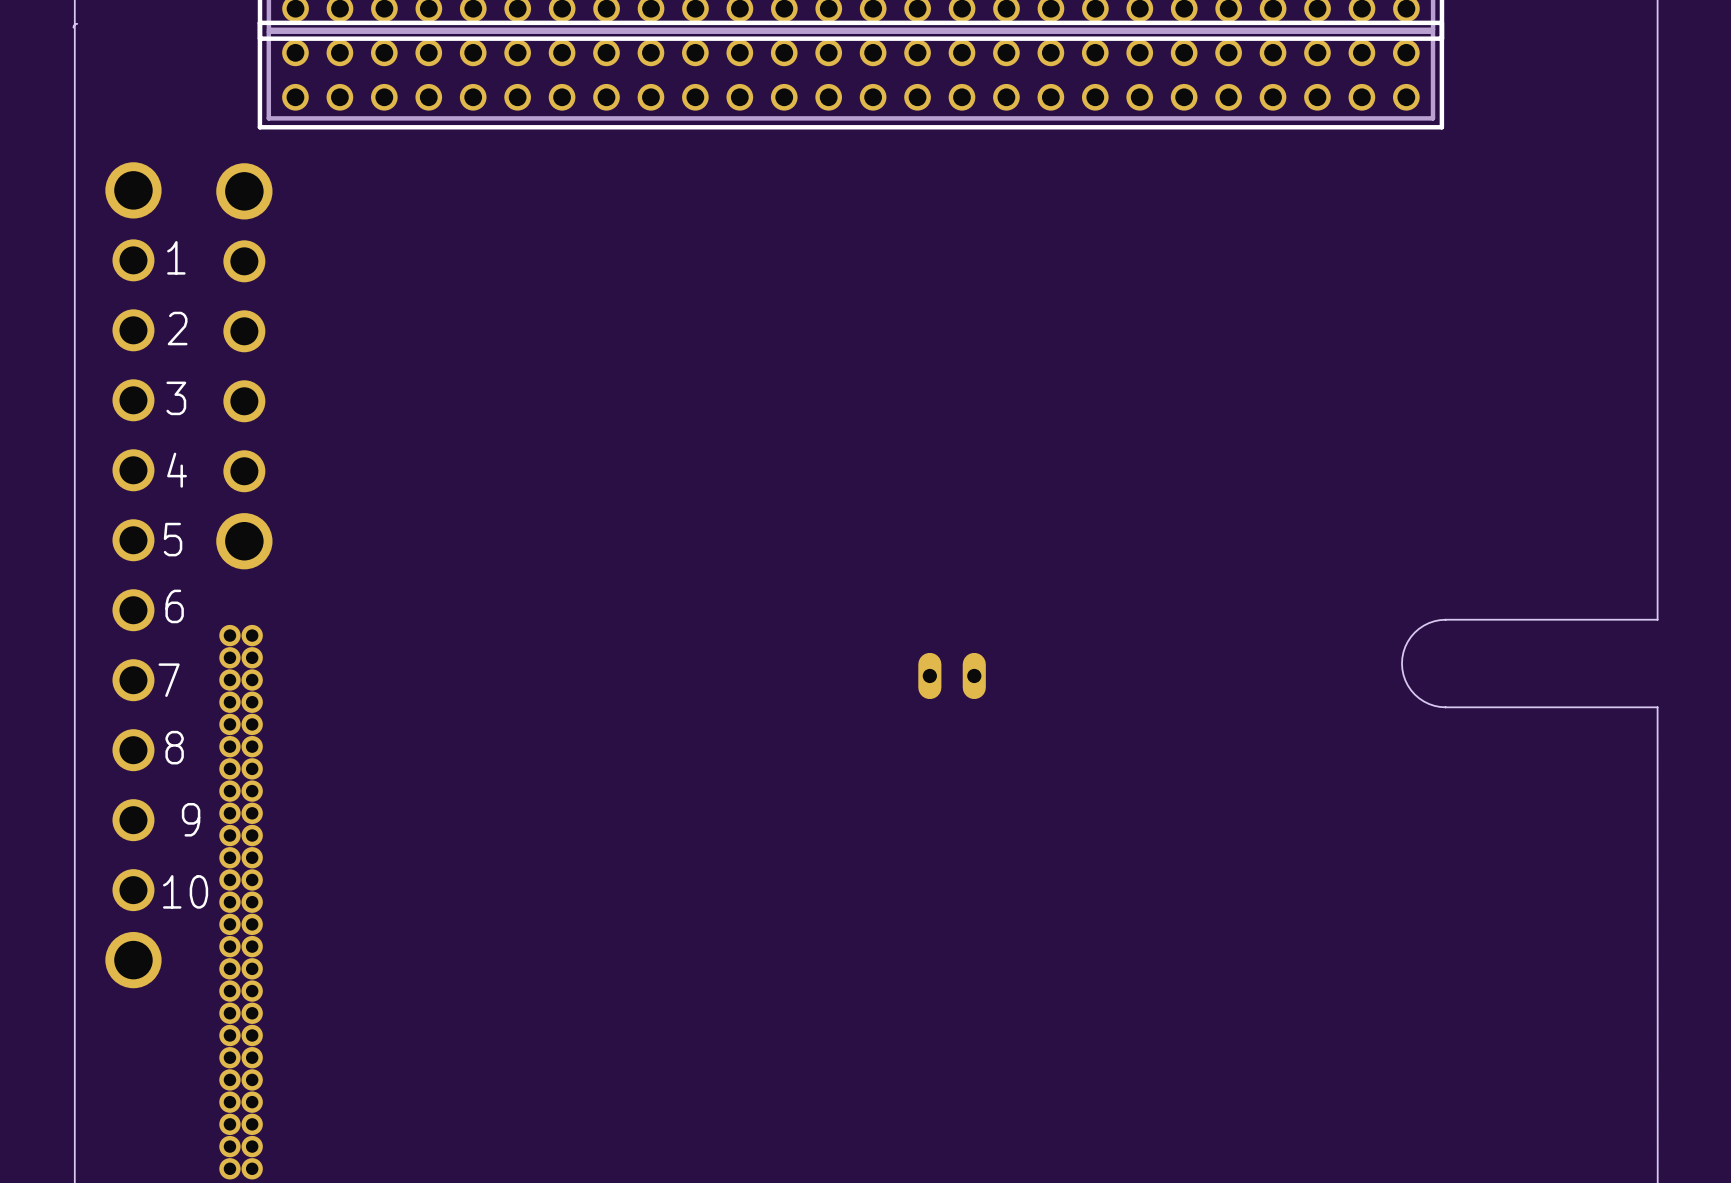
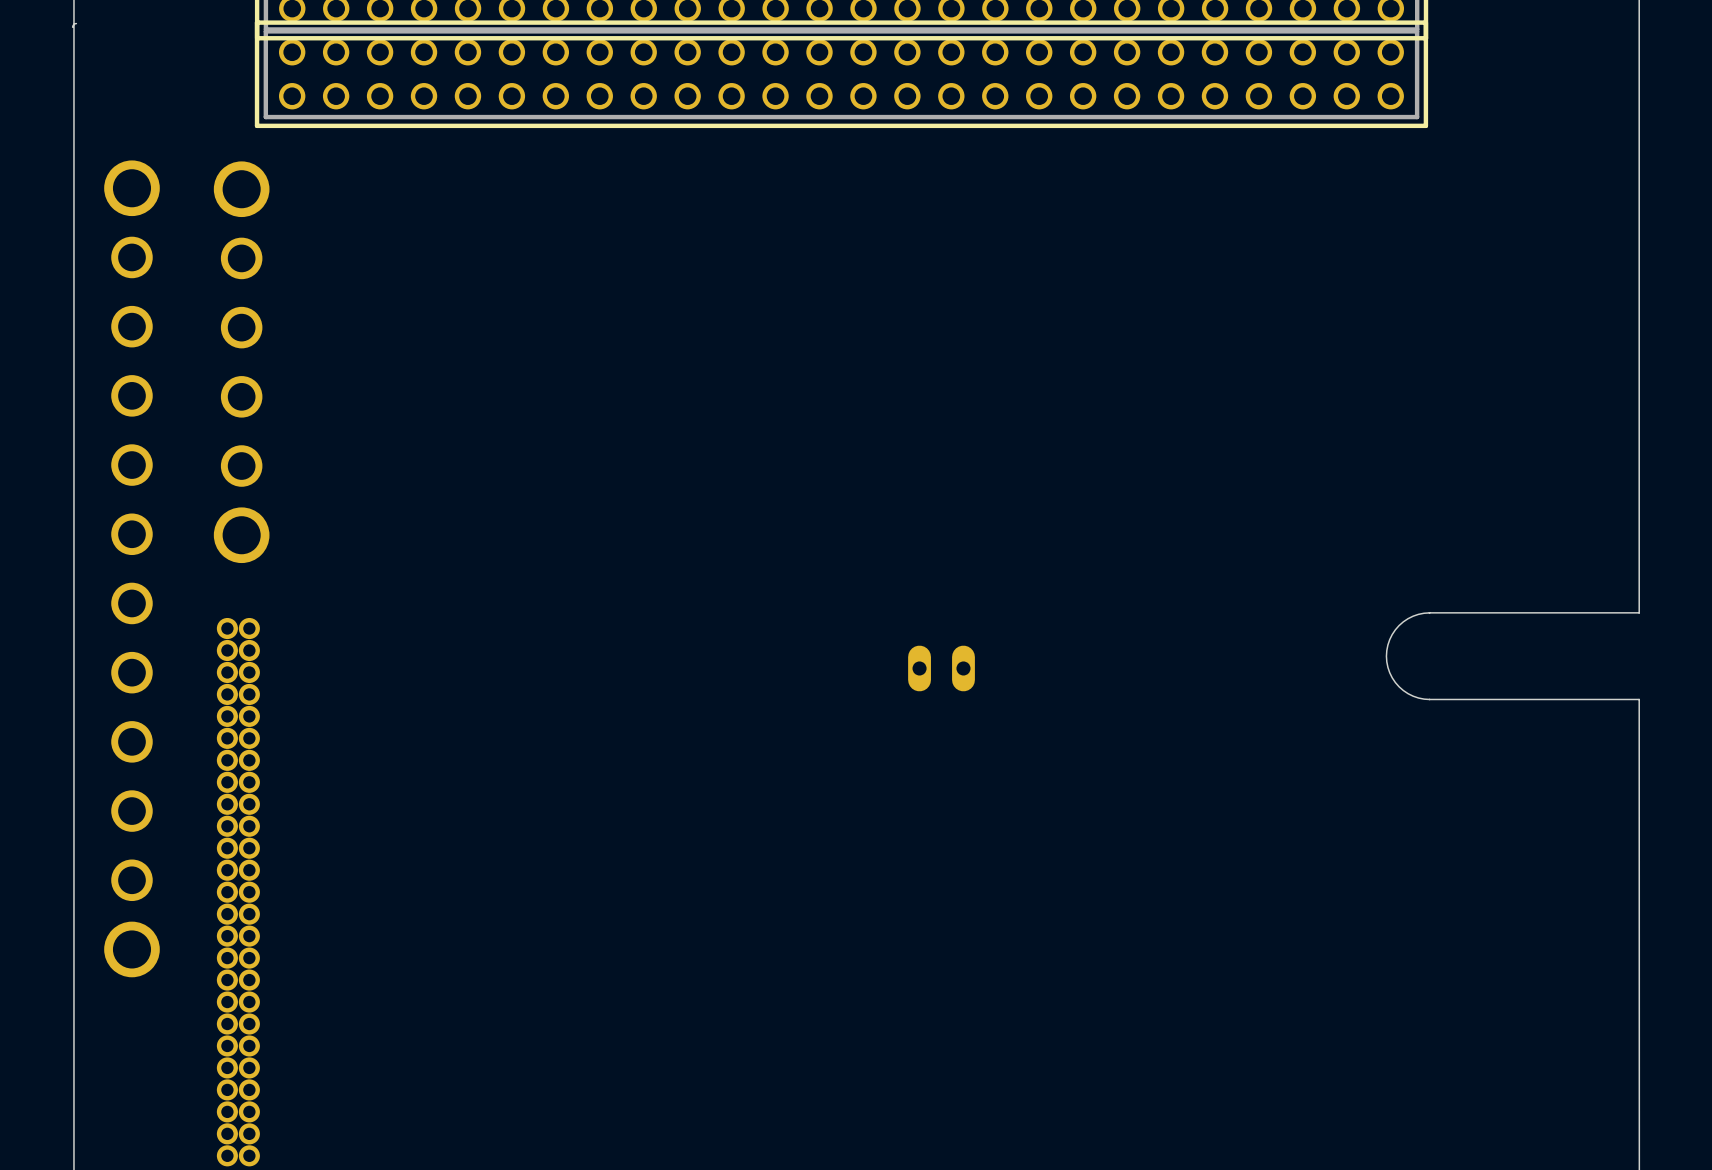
text: 1 (176, 257) -> none
text: 2 (177, 328) -> none
text: 3 (176, 398) -> none
text: 4 (177, 470) -> none
text: 5 (173, 539) -> none
text: 6 (174, 606) -> none
text: 7 (169, 680) -> none
text: 8 (174, 747) -> none
text: 9 (191, 819) -> none
text: 10 (185, 891) -> none

